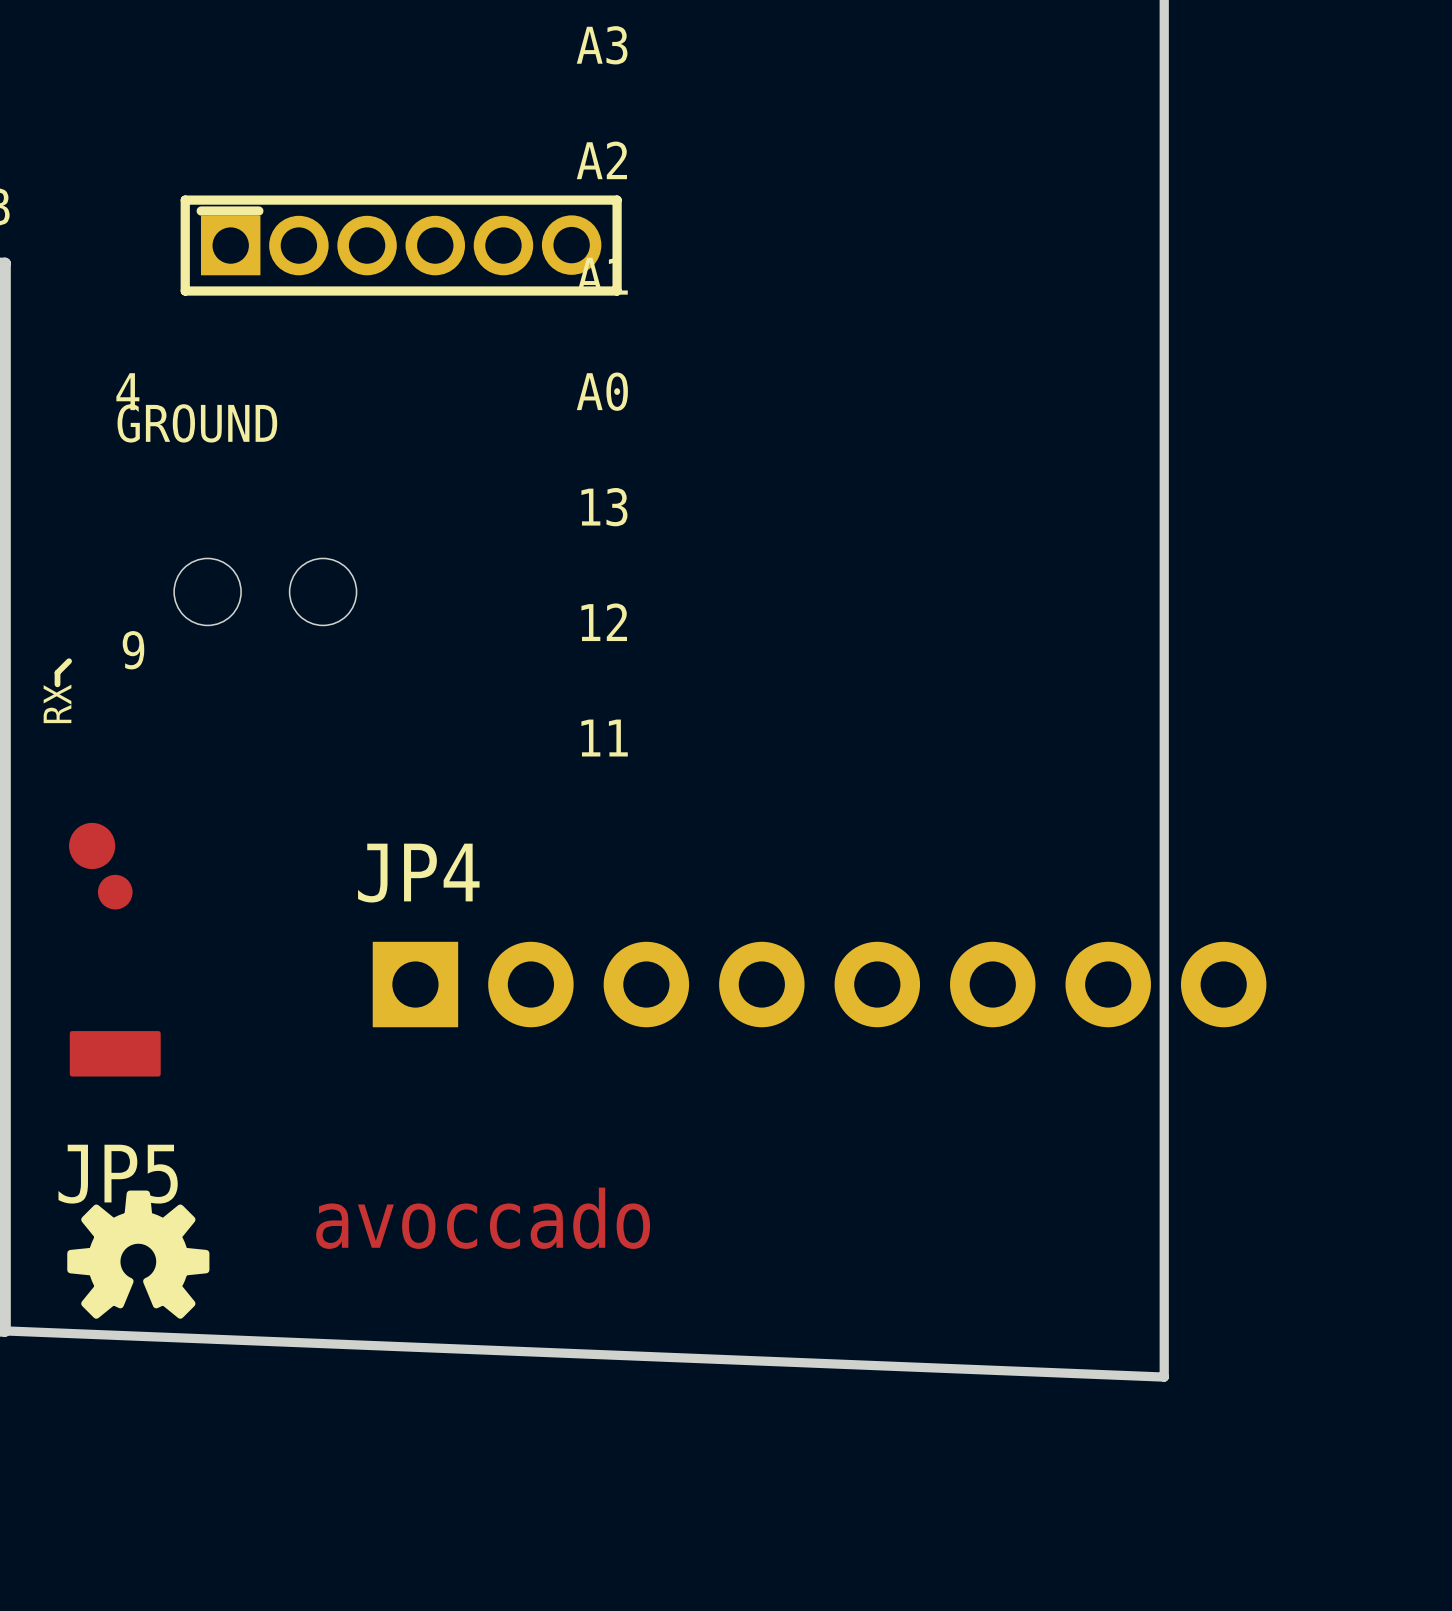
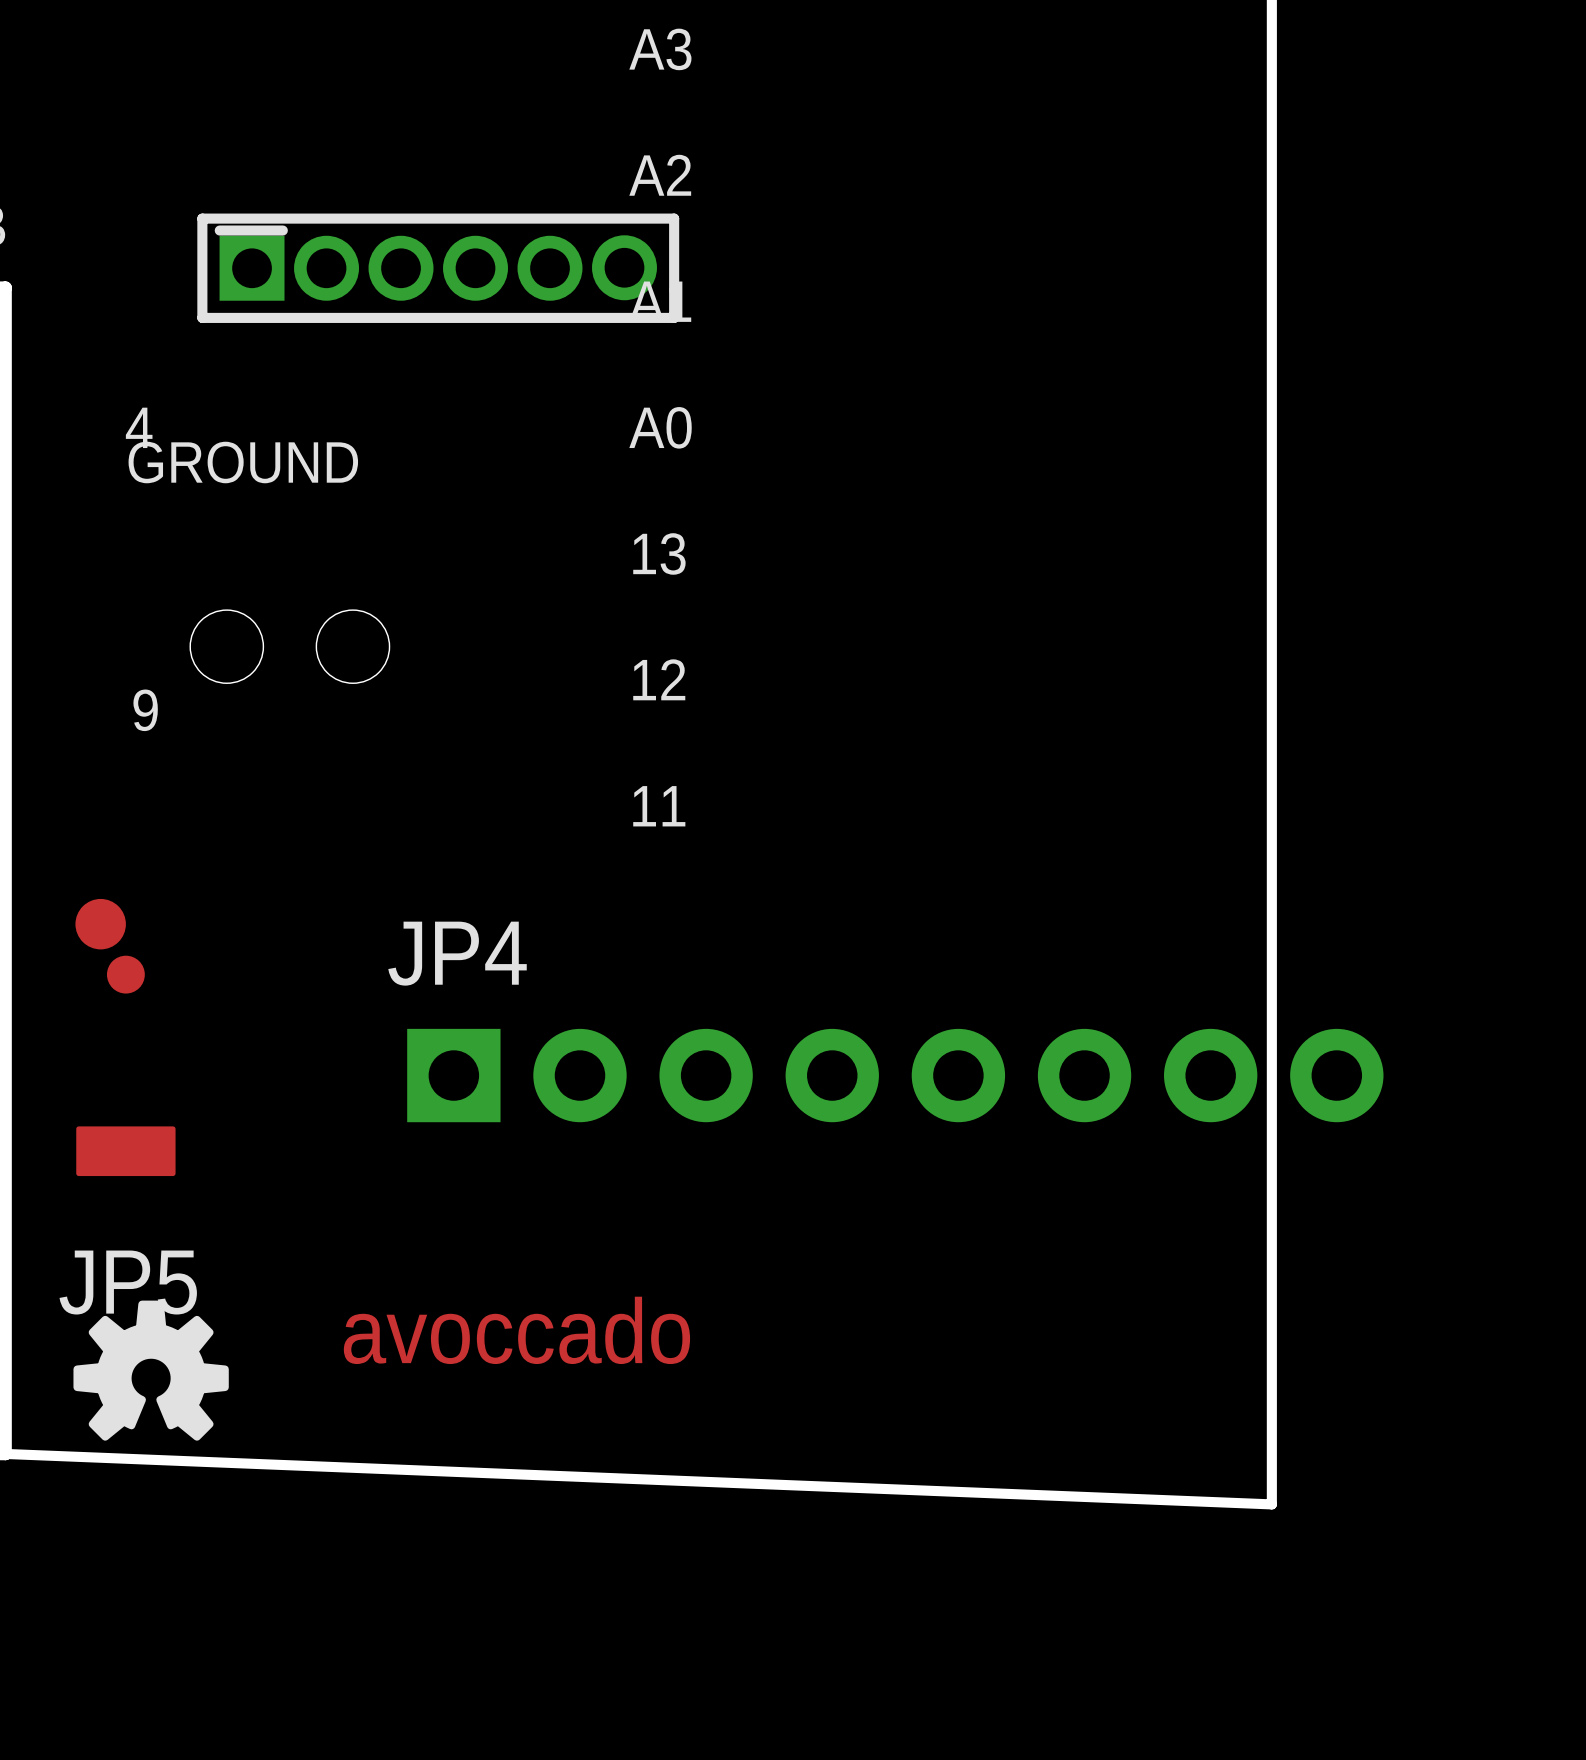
line: (69, 661) (57, 672) (57, 684) -> none
text: RX (57, 703) -> none

